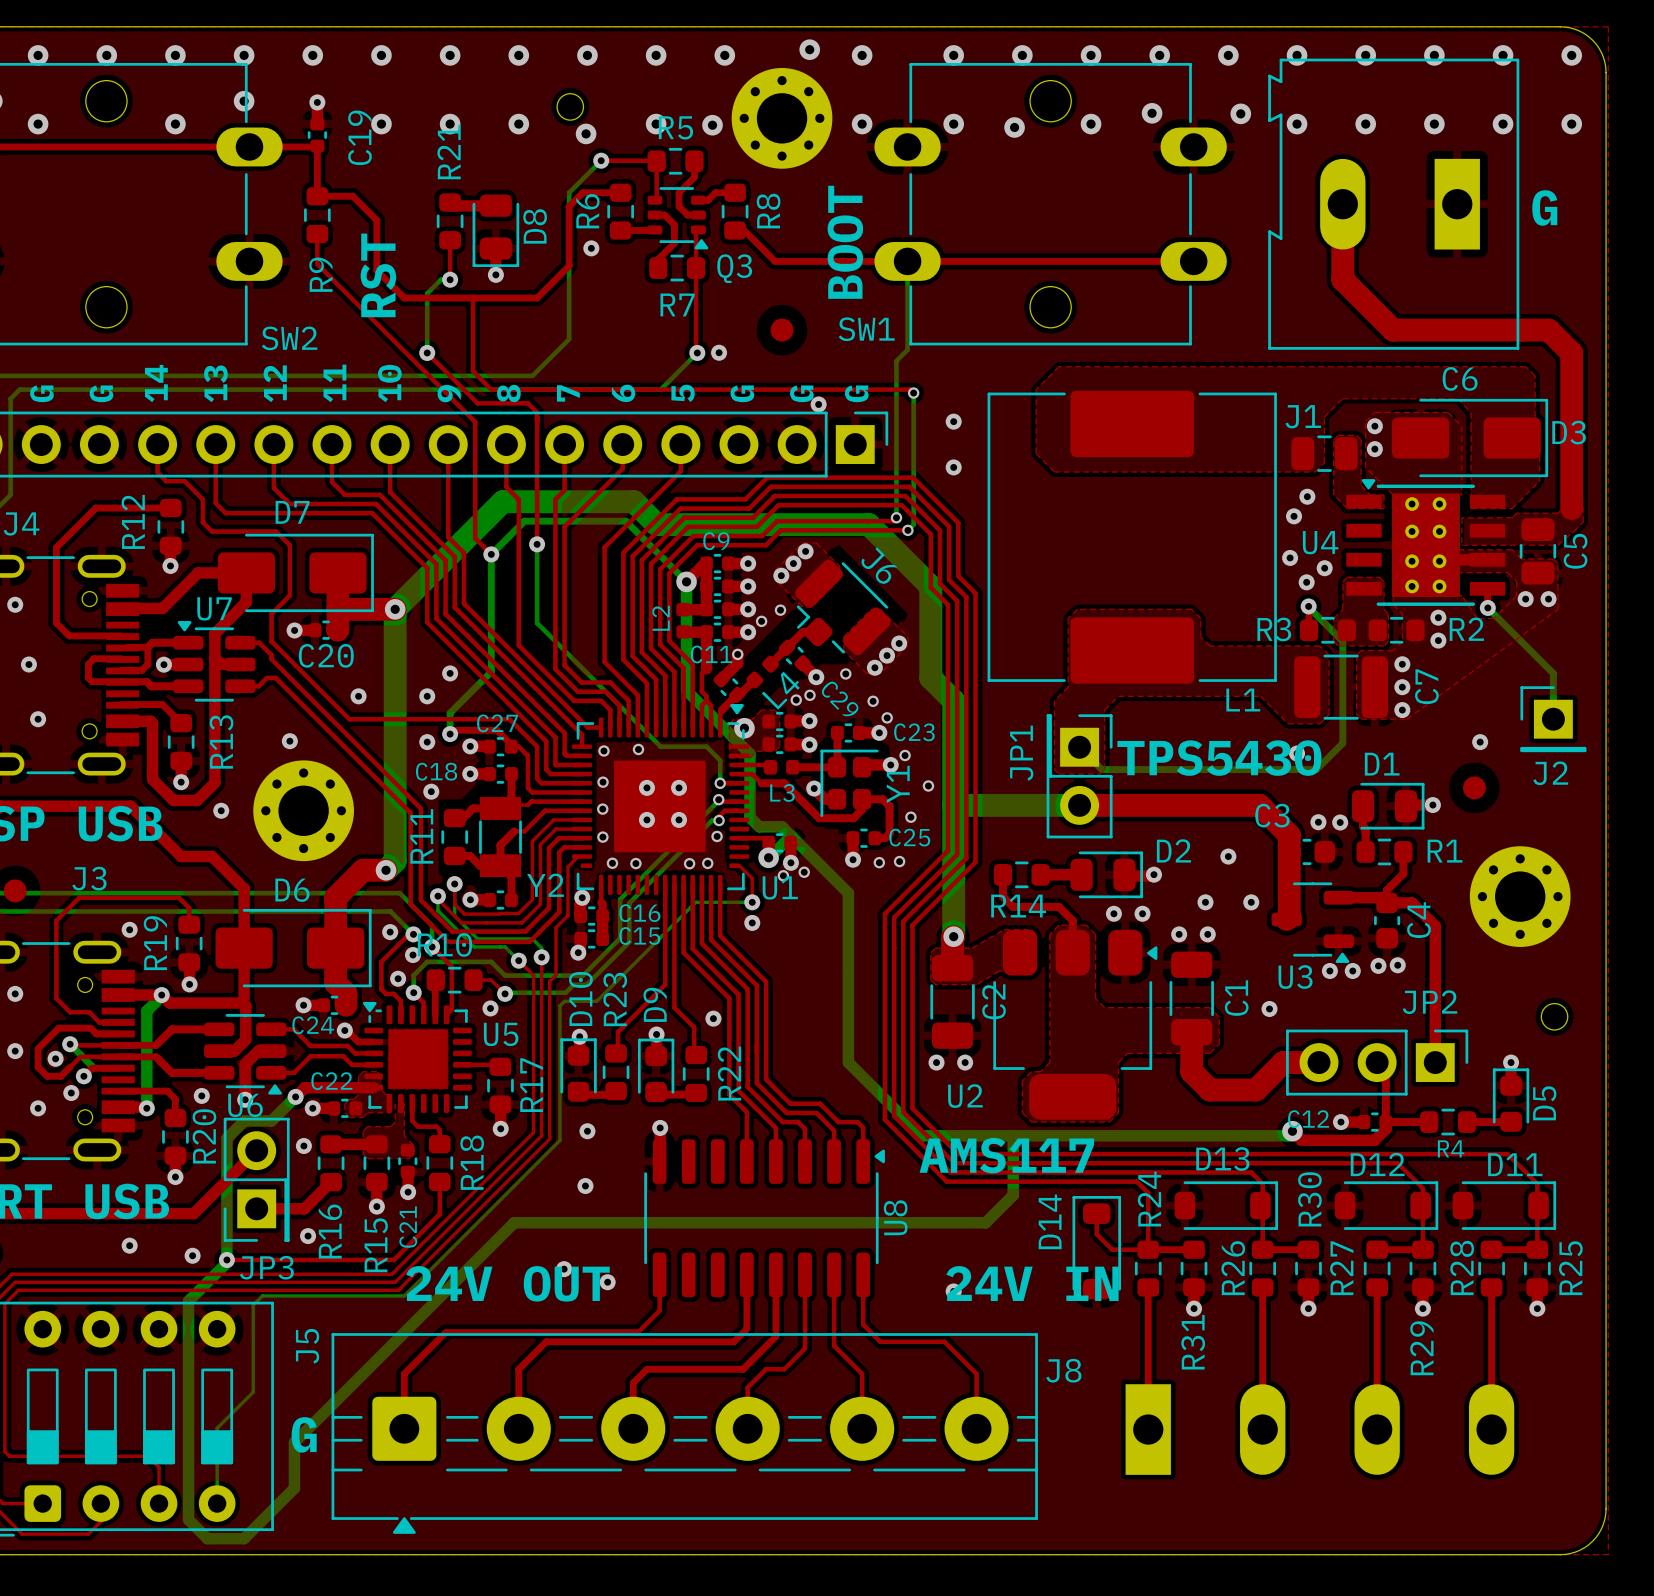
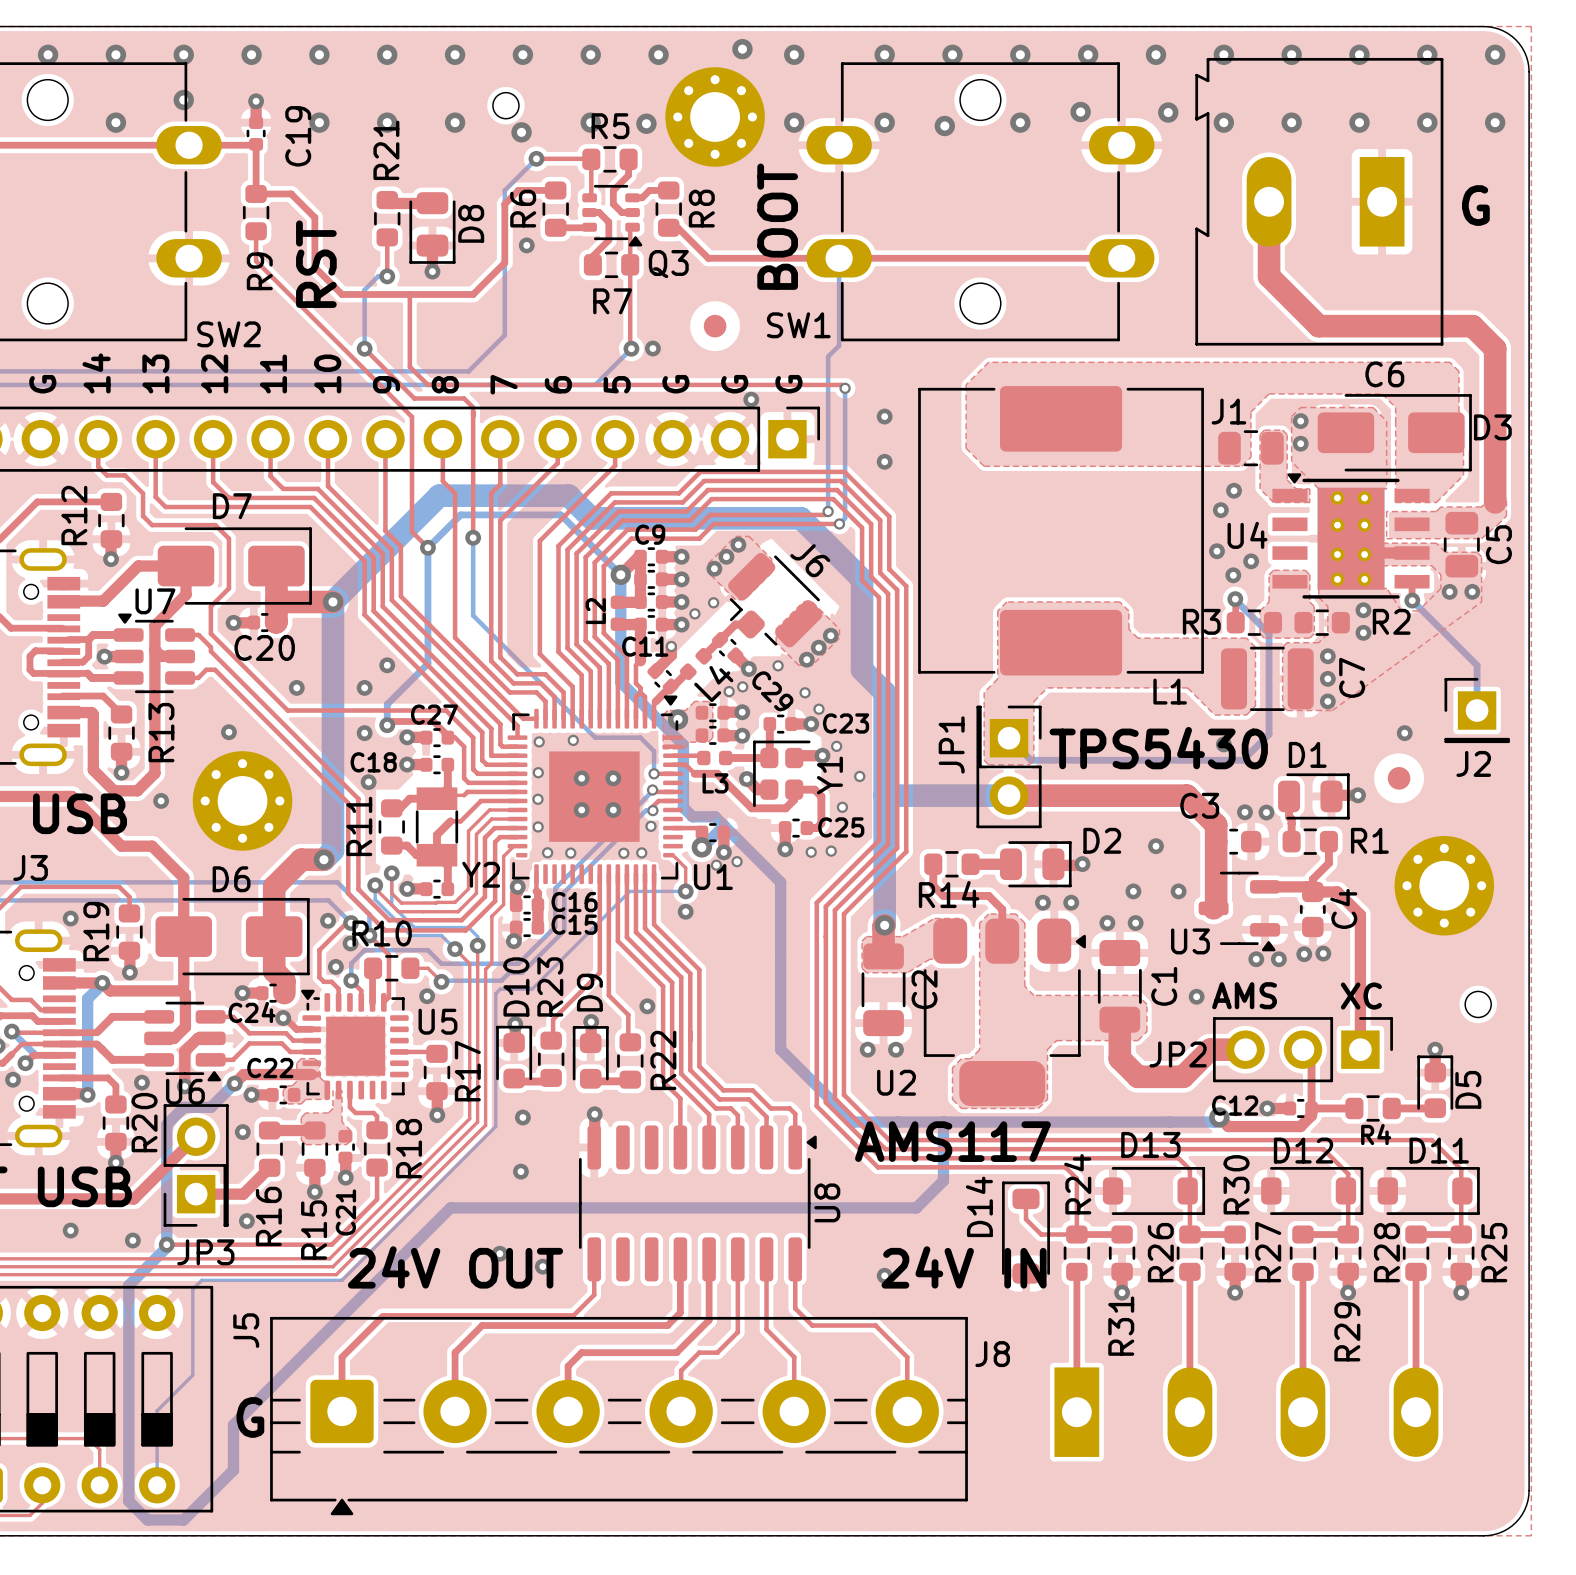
U3 name position: U3 (1295, 977) -> U3 (1190, 941)
JP2 name position: JP2 (1429, 1002) -> JP2 (1178, 1054)
text: none -> AMS (1244, 995)
text: none -> XC (1361, 996)

